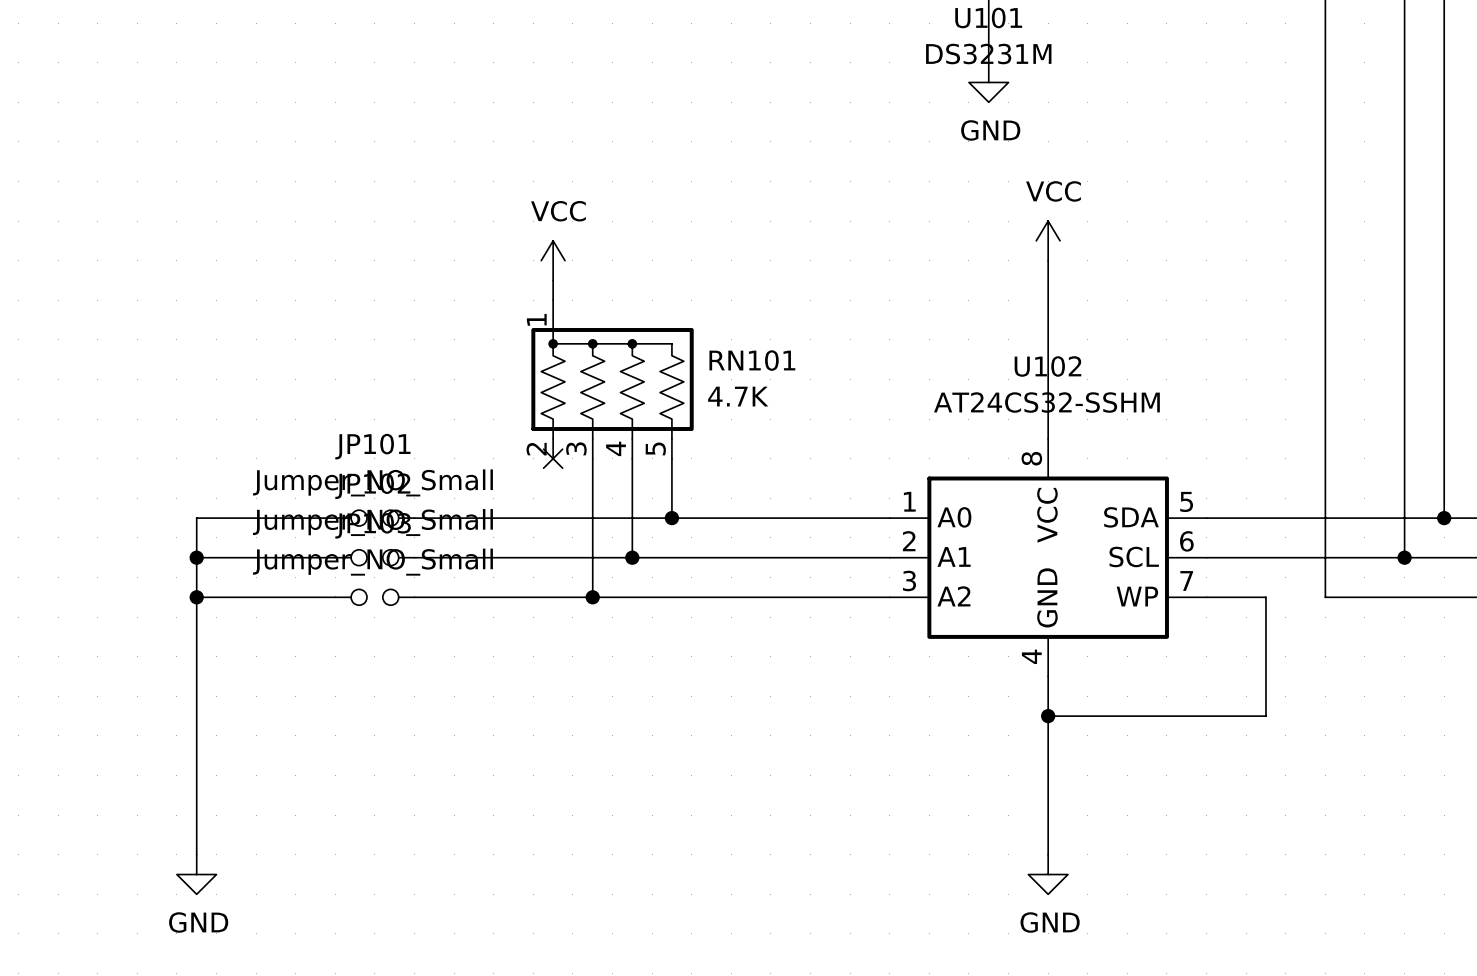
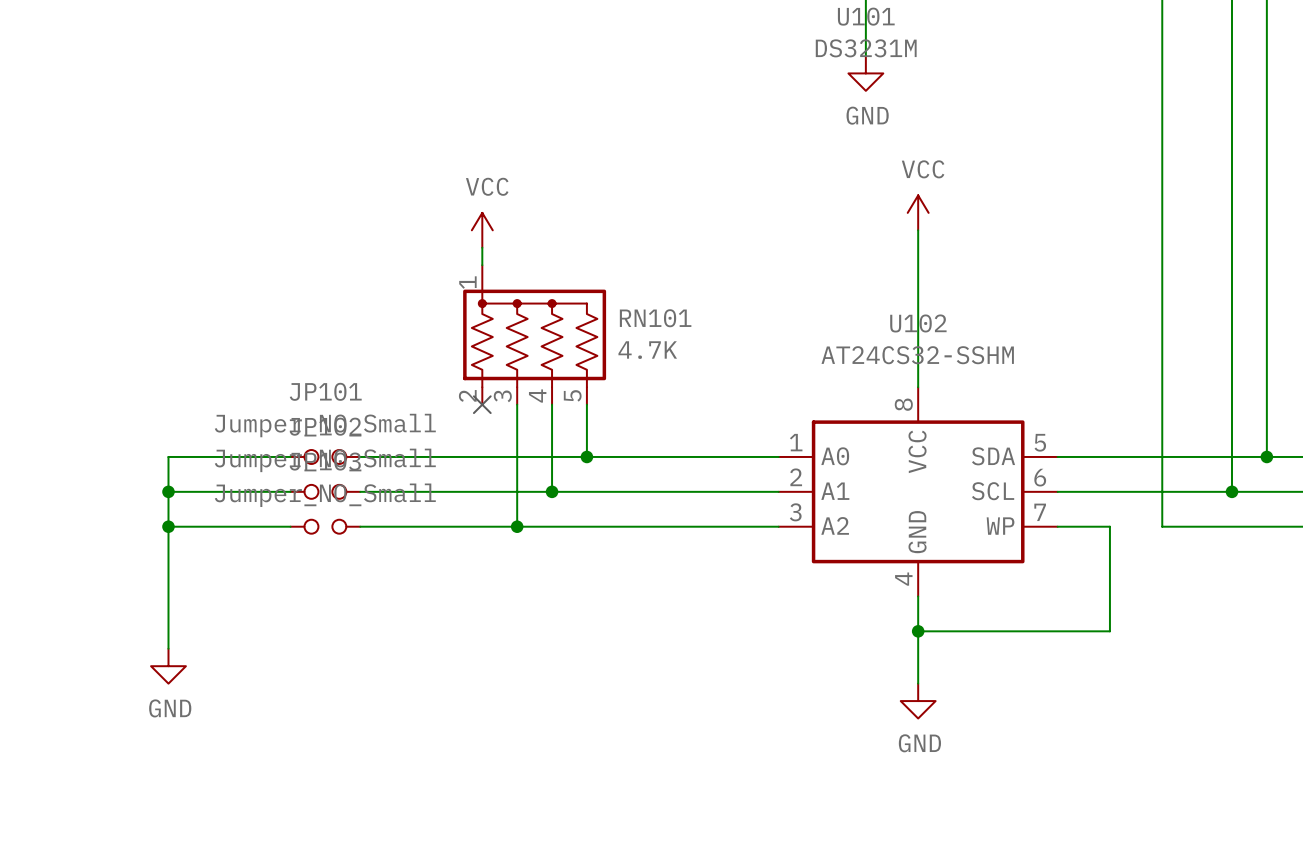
wire: (196, 735) (196, 854) -> none
wire: (1048, 775) (1048, 854) -> none
power symbol position: GND (196, 874) -> GND (168, 666)
power symbol position: GND (1048, 874) -> GND (918, 701)

